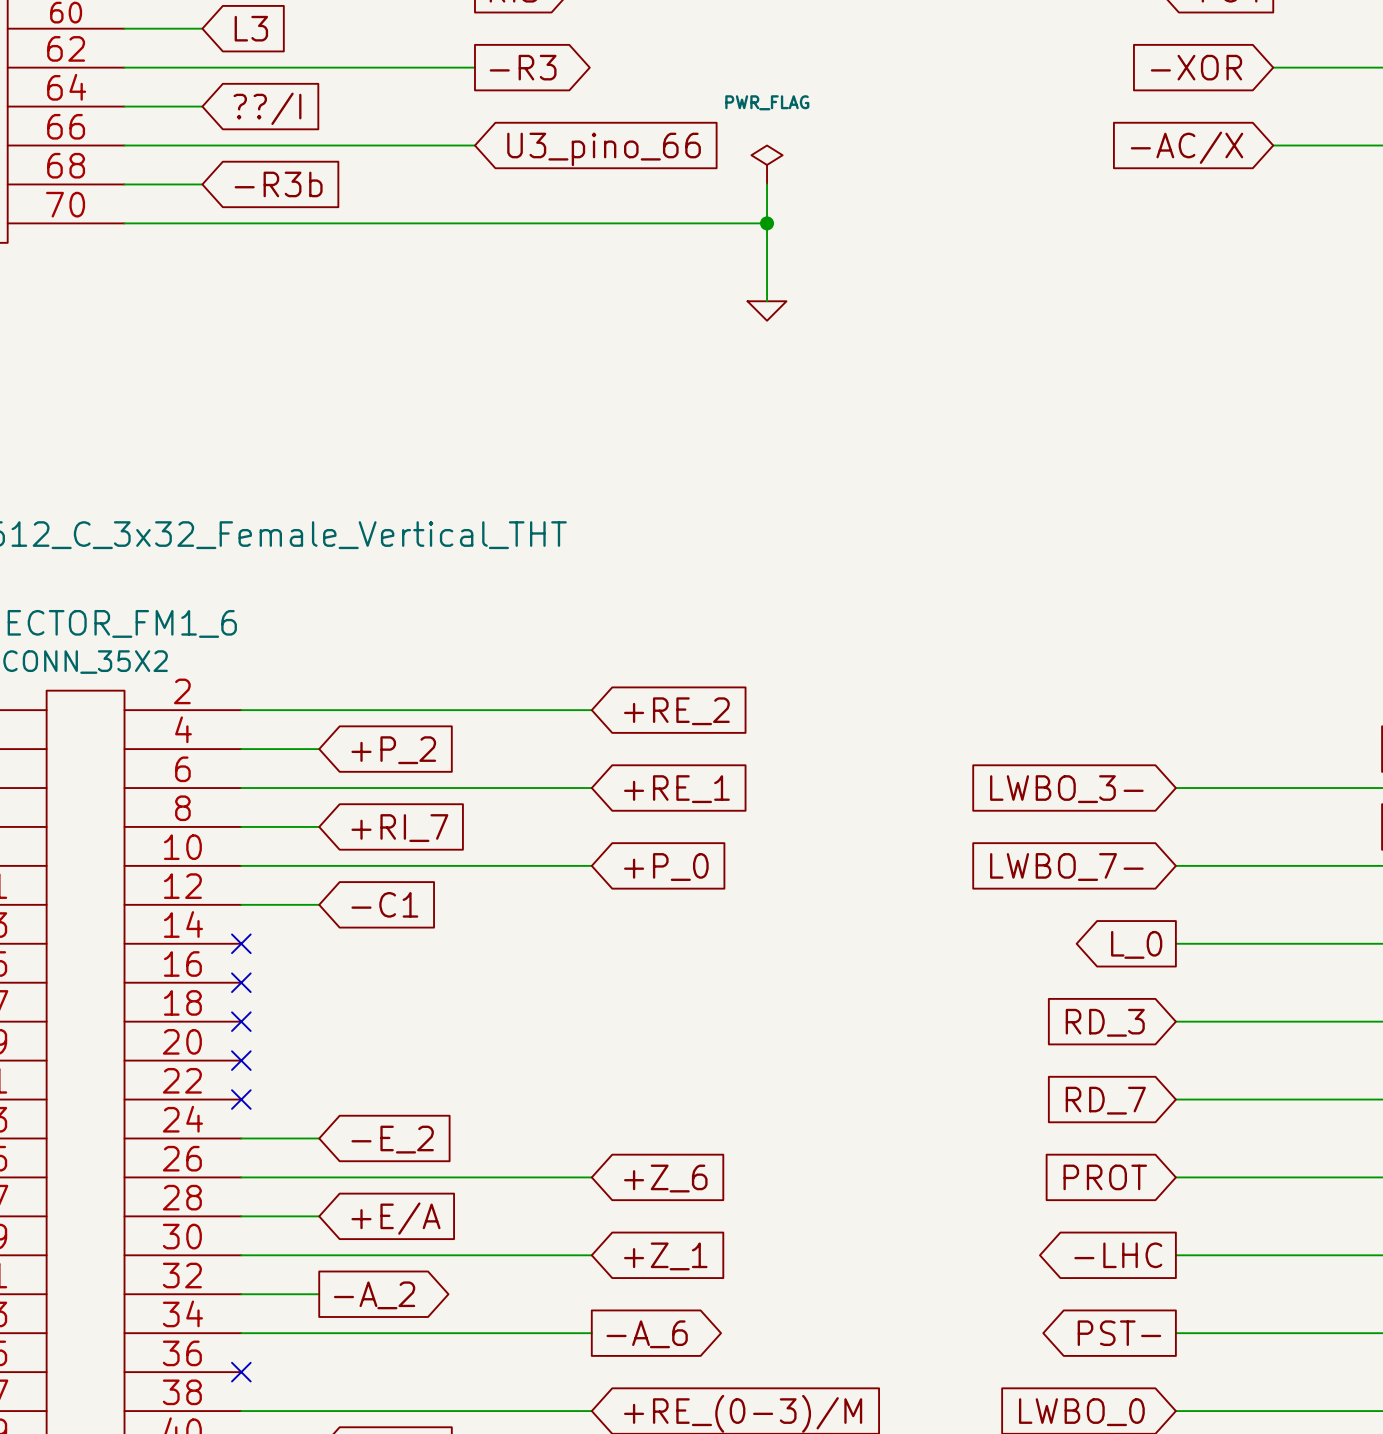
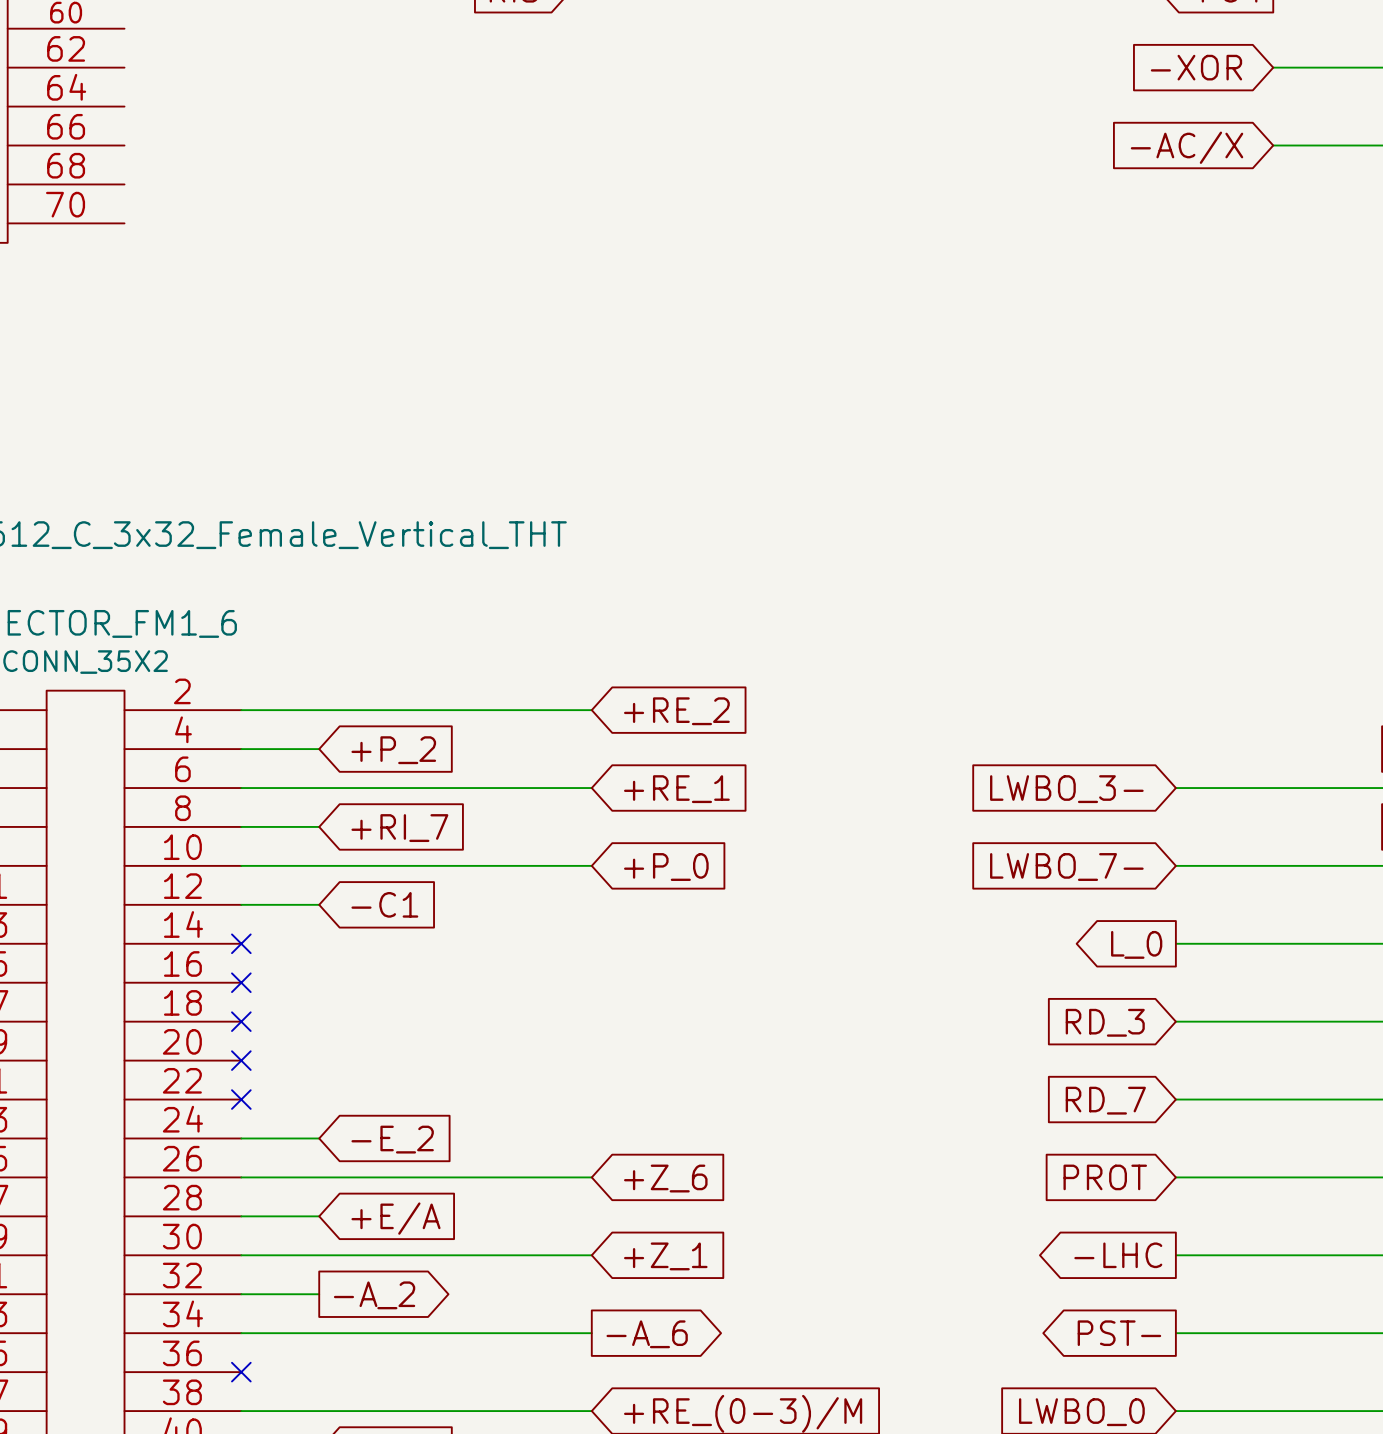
wire: (124, 28) (202, 28) -> none
global label: L3 (251, 28) -> none
wire: (124, 67) (474, 67) -> none
global label: -R3 (523, 67) -> none
wire: (124, 106) (202, 106) -> none
global label: ??/I (267, 108) -> none
wire: (124, 145) (474, 145) -> none
global label: U3_pino_66 (604, 149) -> none
power symbol: PWR_FLAG (767, 164) -> none
wire: (124, 184) (202, 184) -> none
global label: -R3b (278, 184) -> none
wire: (767, 184) (767, 301) -> none
wire: (124, 223) (767, 223) -> none
junction: (767, 223) -> none
power symbol: (767, 311) -> none

